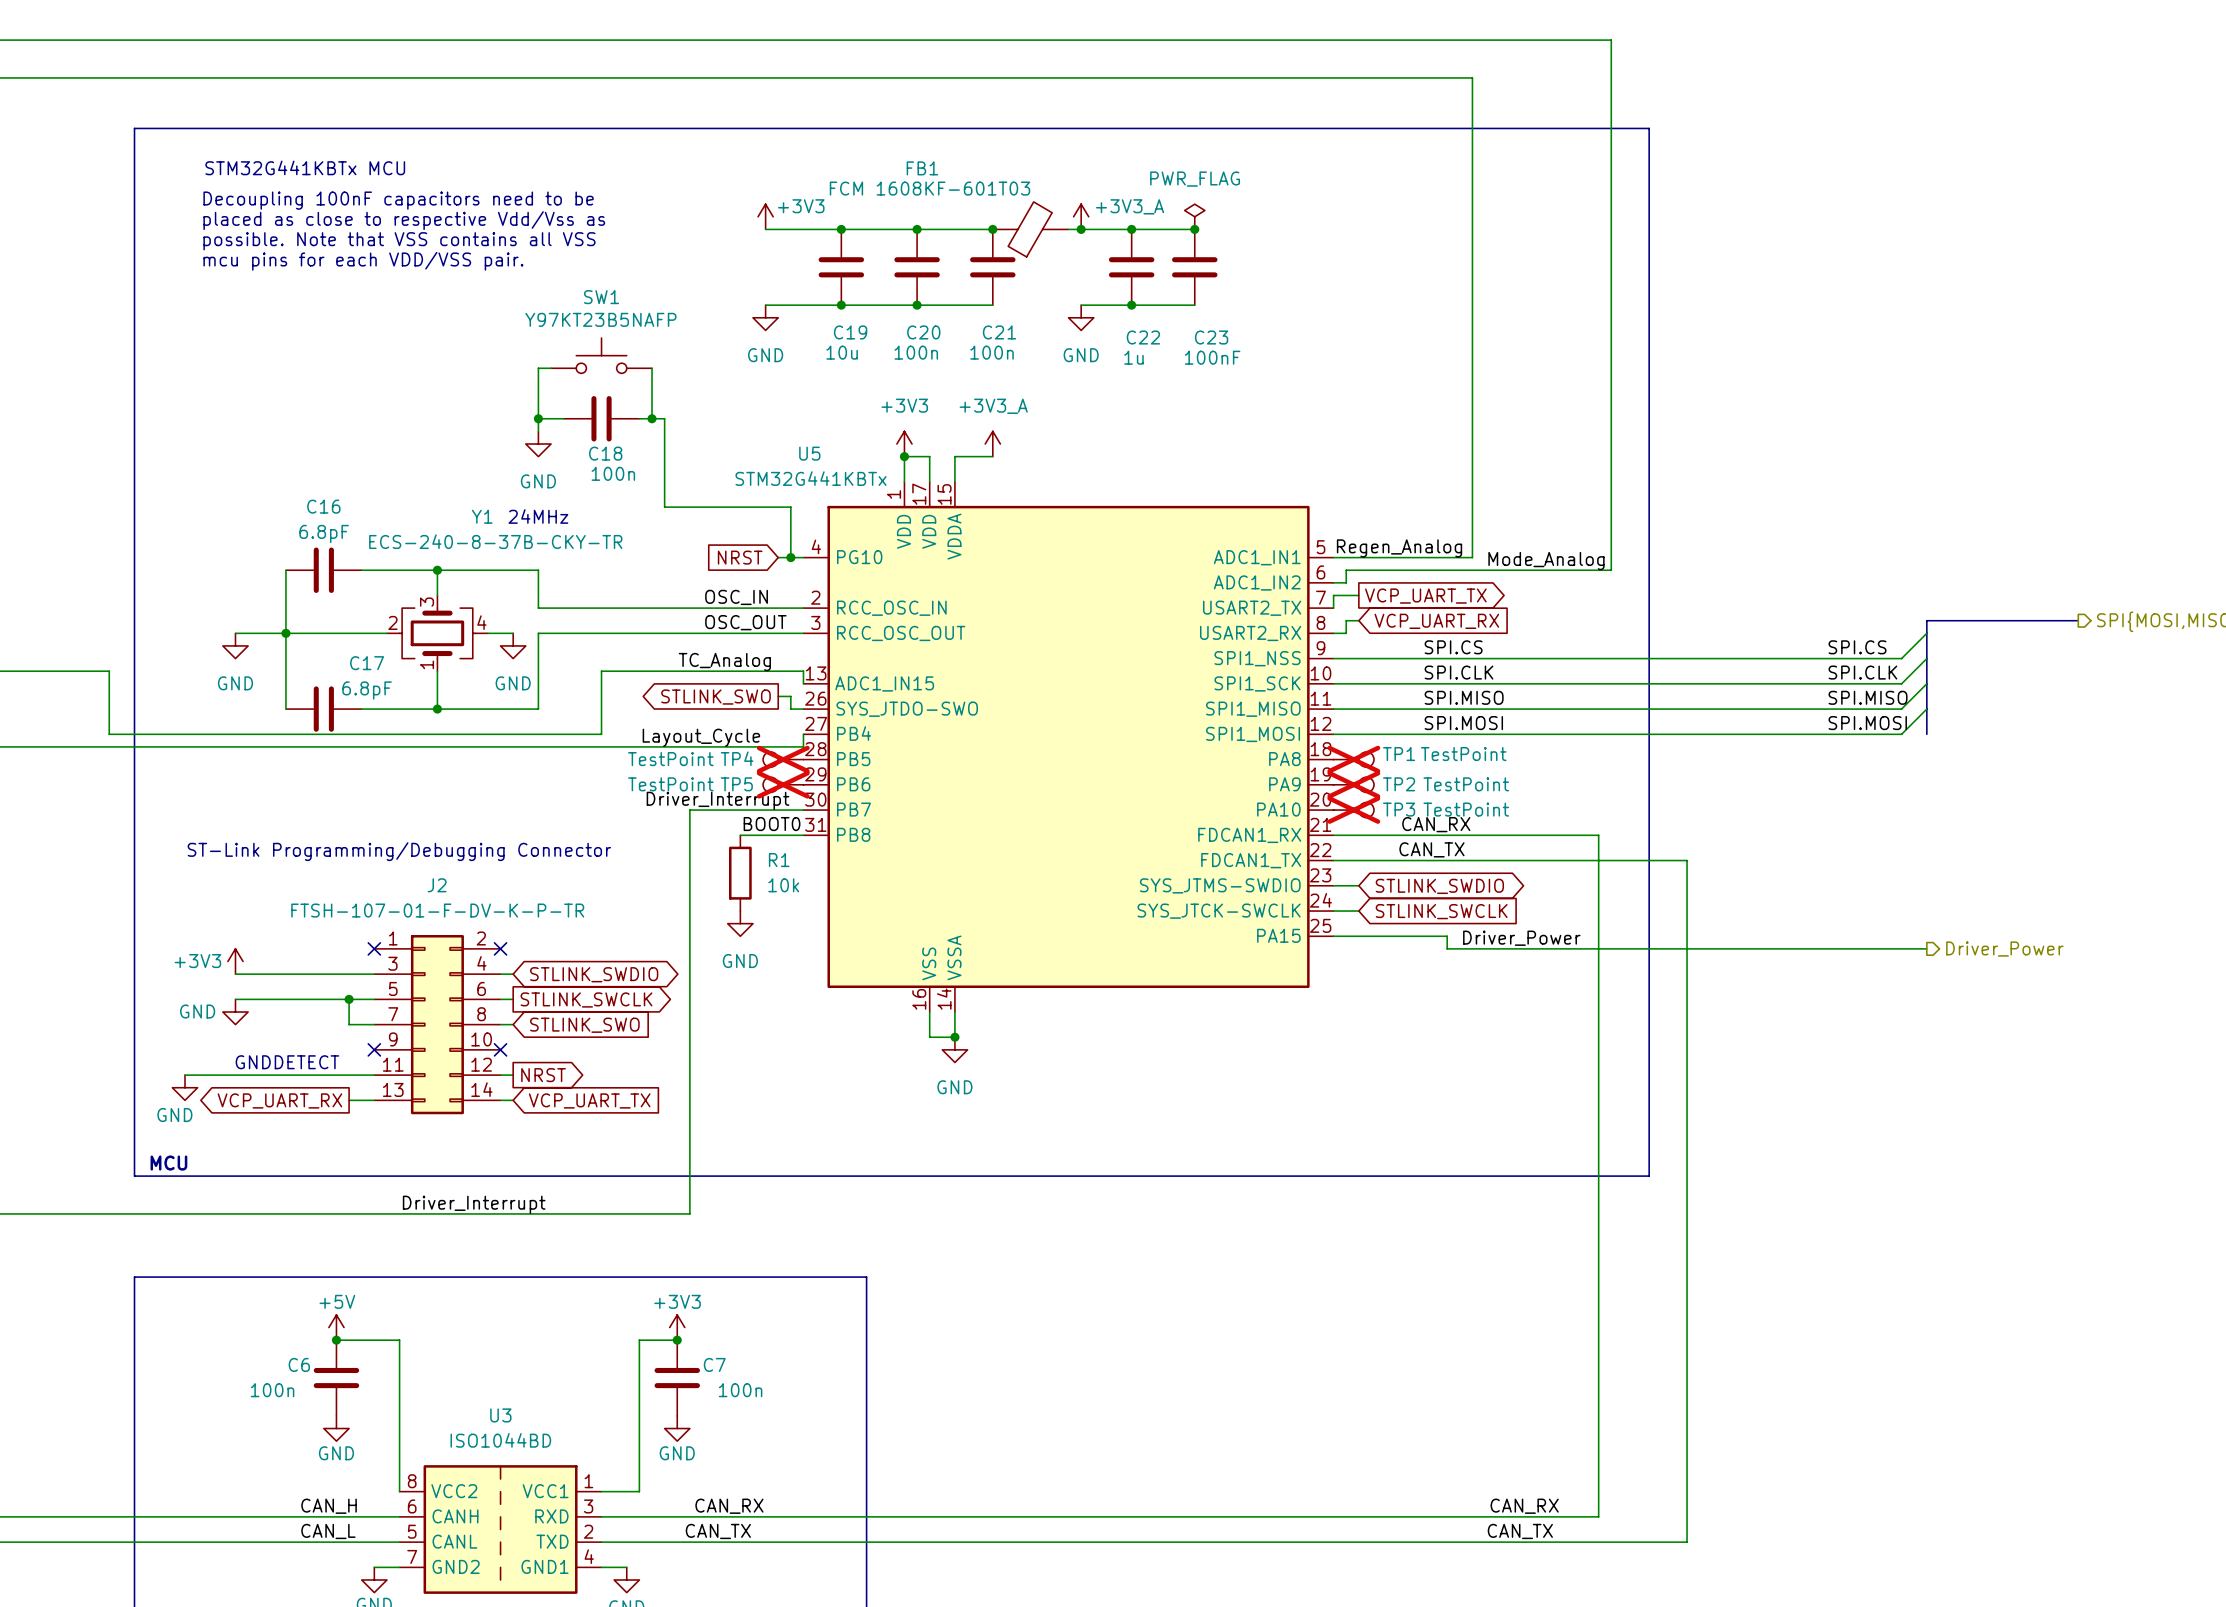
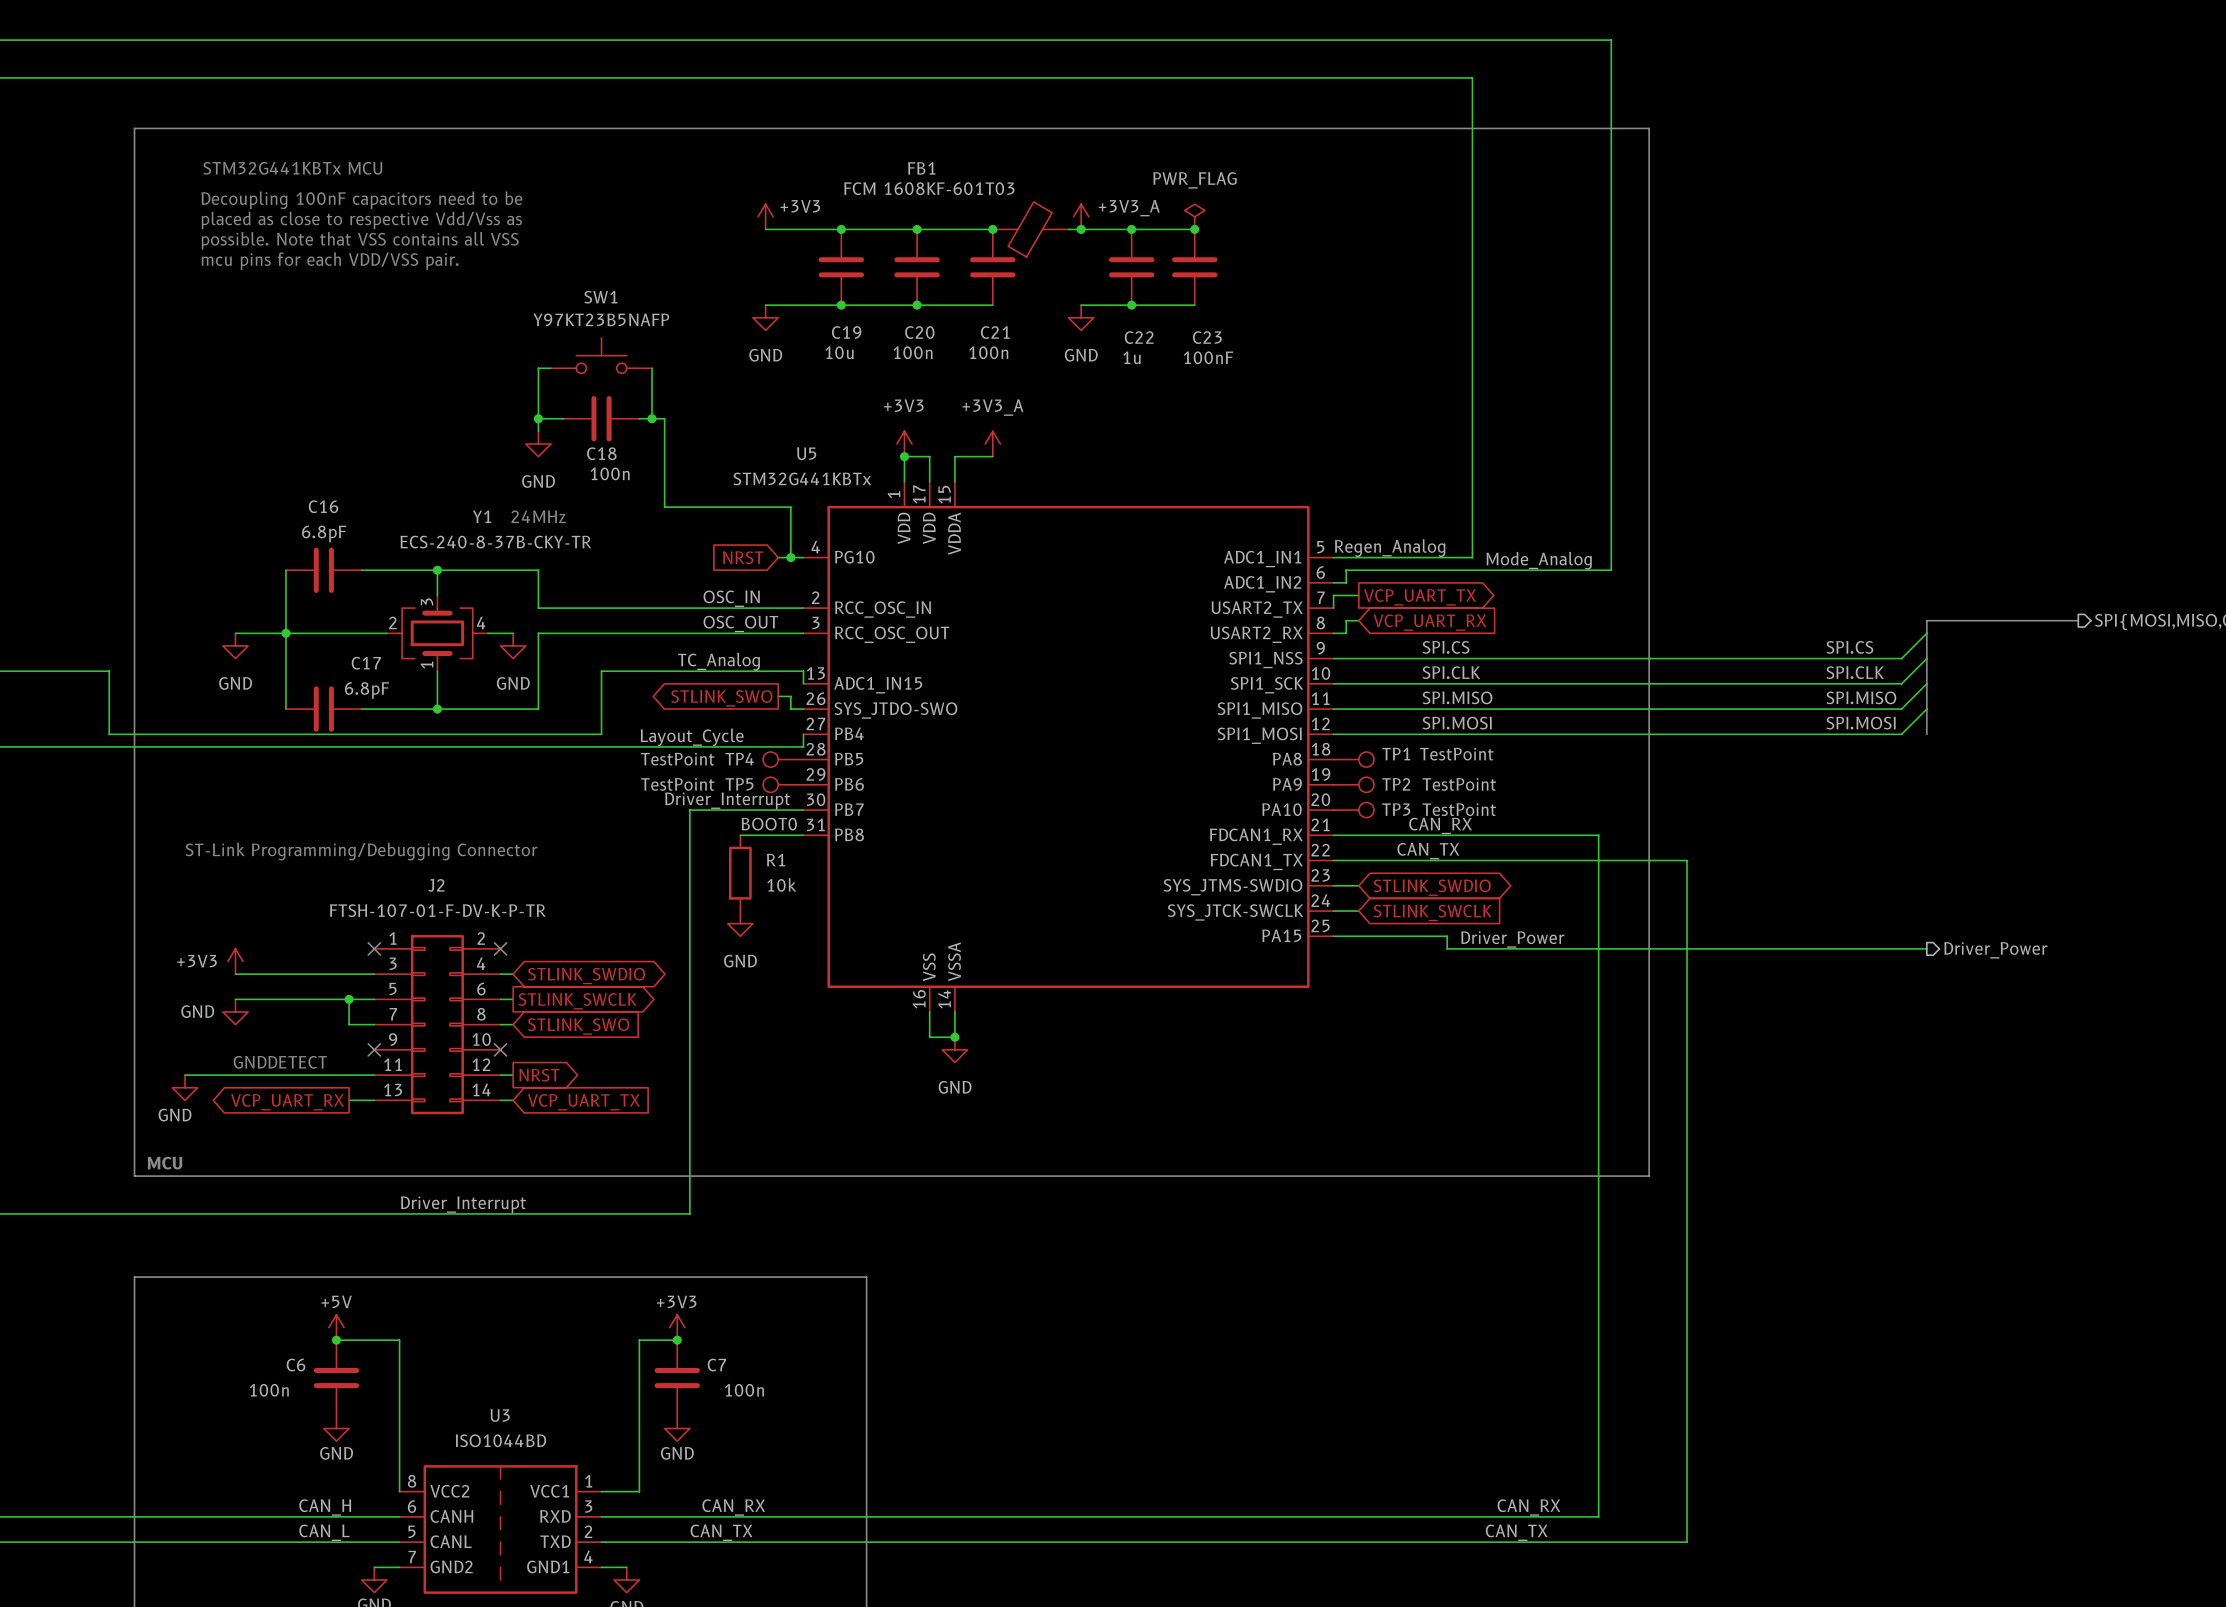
TP4 do-not-place cross: (783, 759) -> none
TP1 do-not-place cross: (1353, 759) -> none
TP5 do-not-place cross: (783, 784) -> none
TP2 do-not-place cross: (1353, 784) -> none
TP3 do-not-place cross: (1353, 810) -> none

